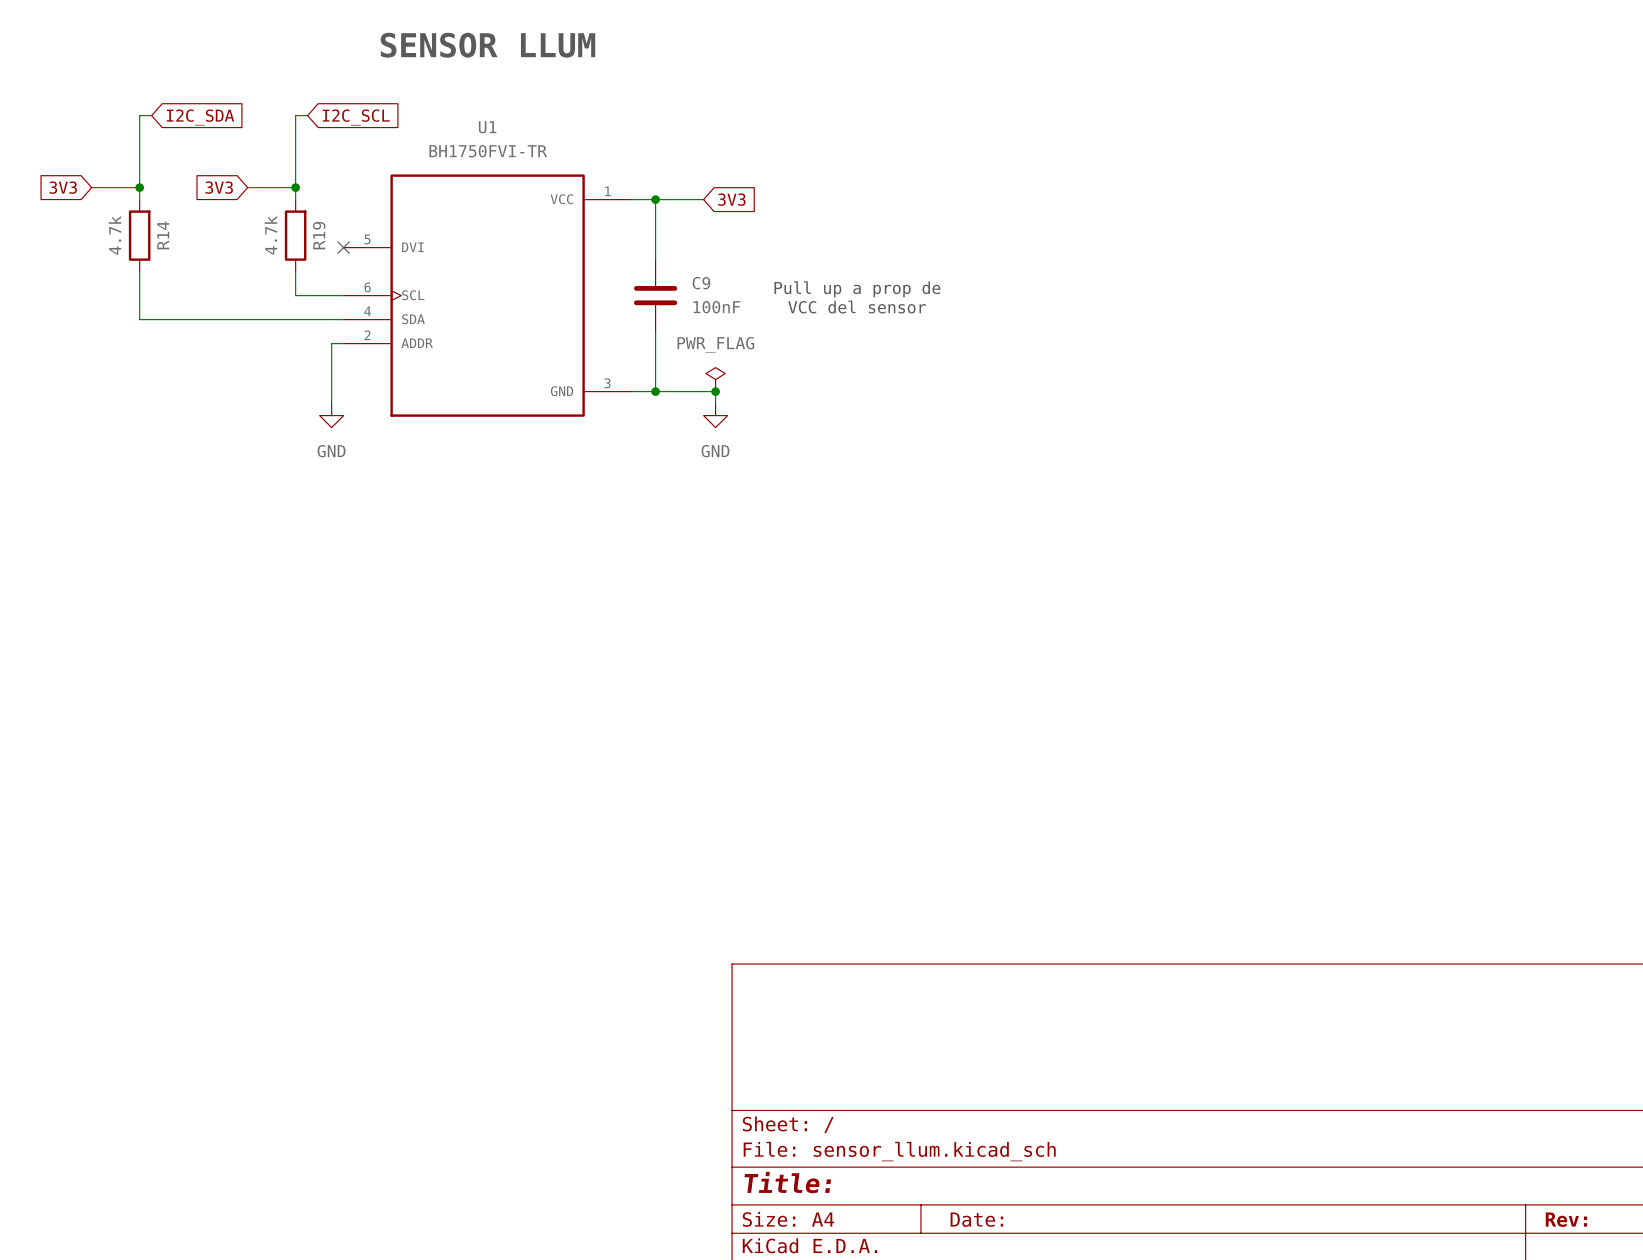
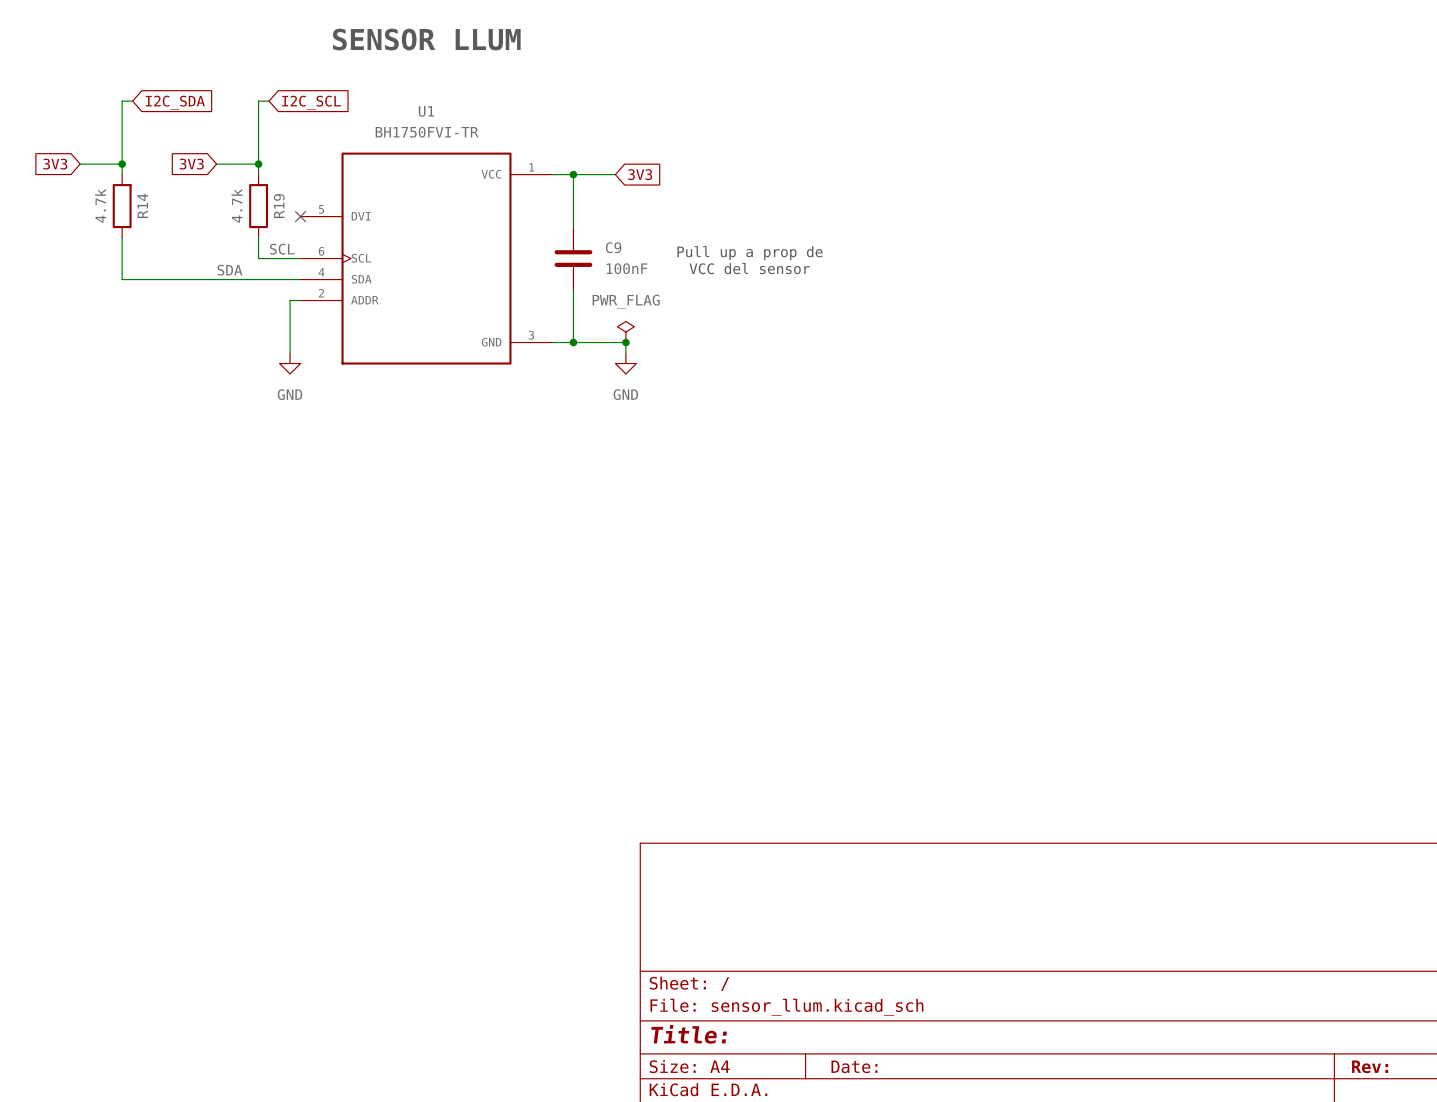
label: none -> SCL (282, 249)
label: none -> SDA (229, 270)

